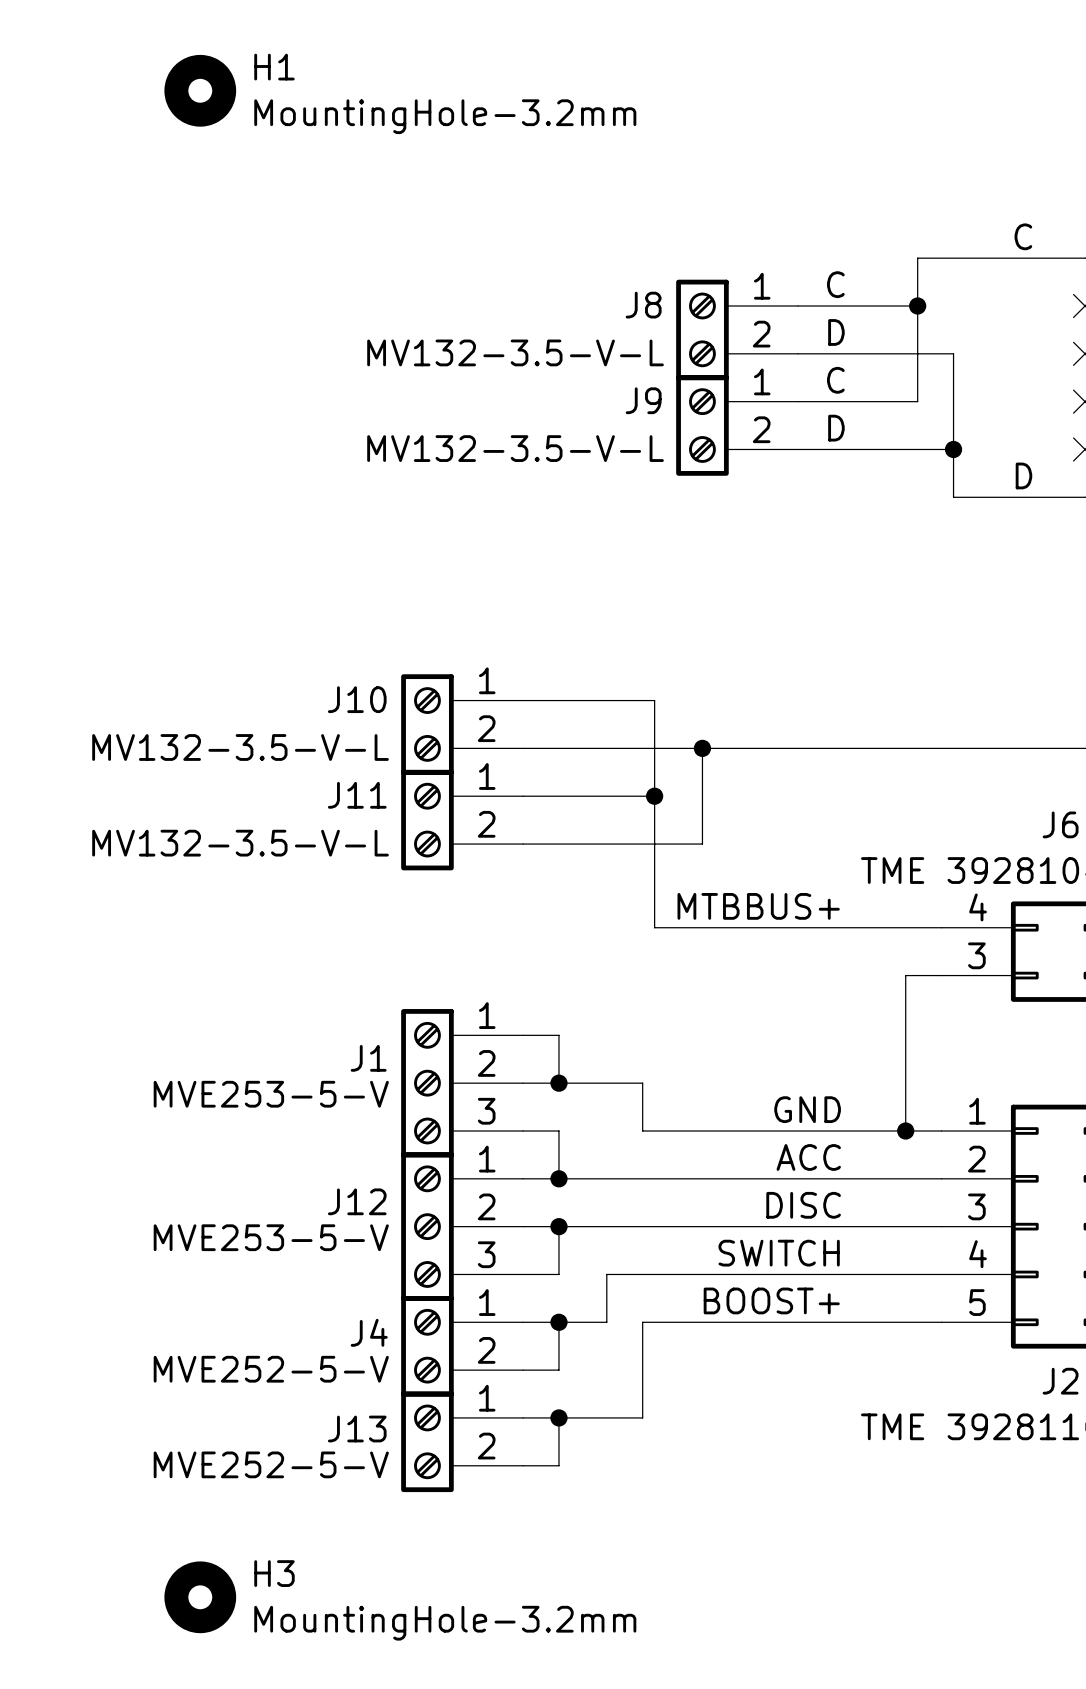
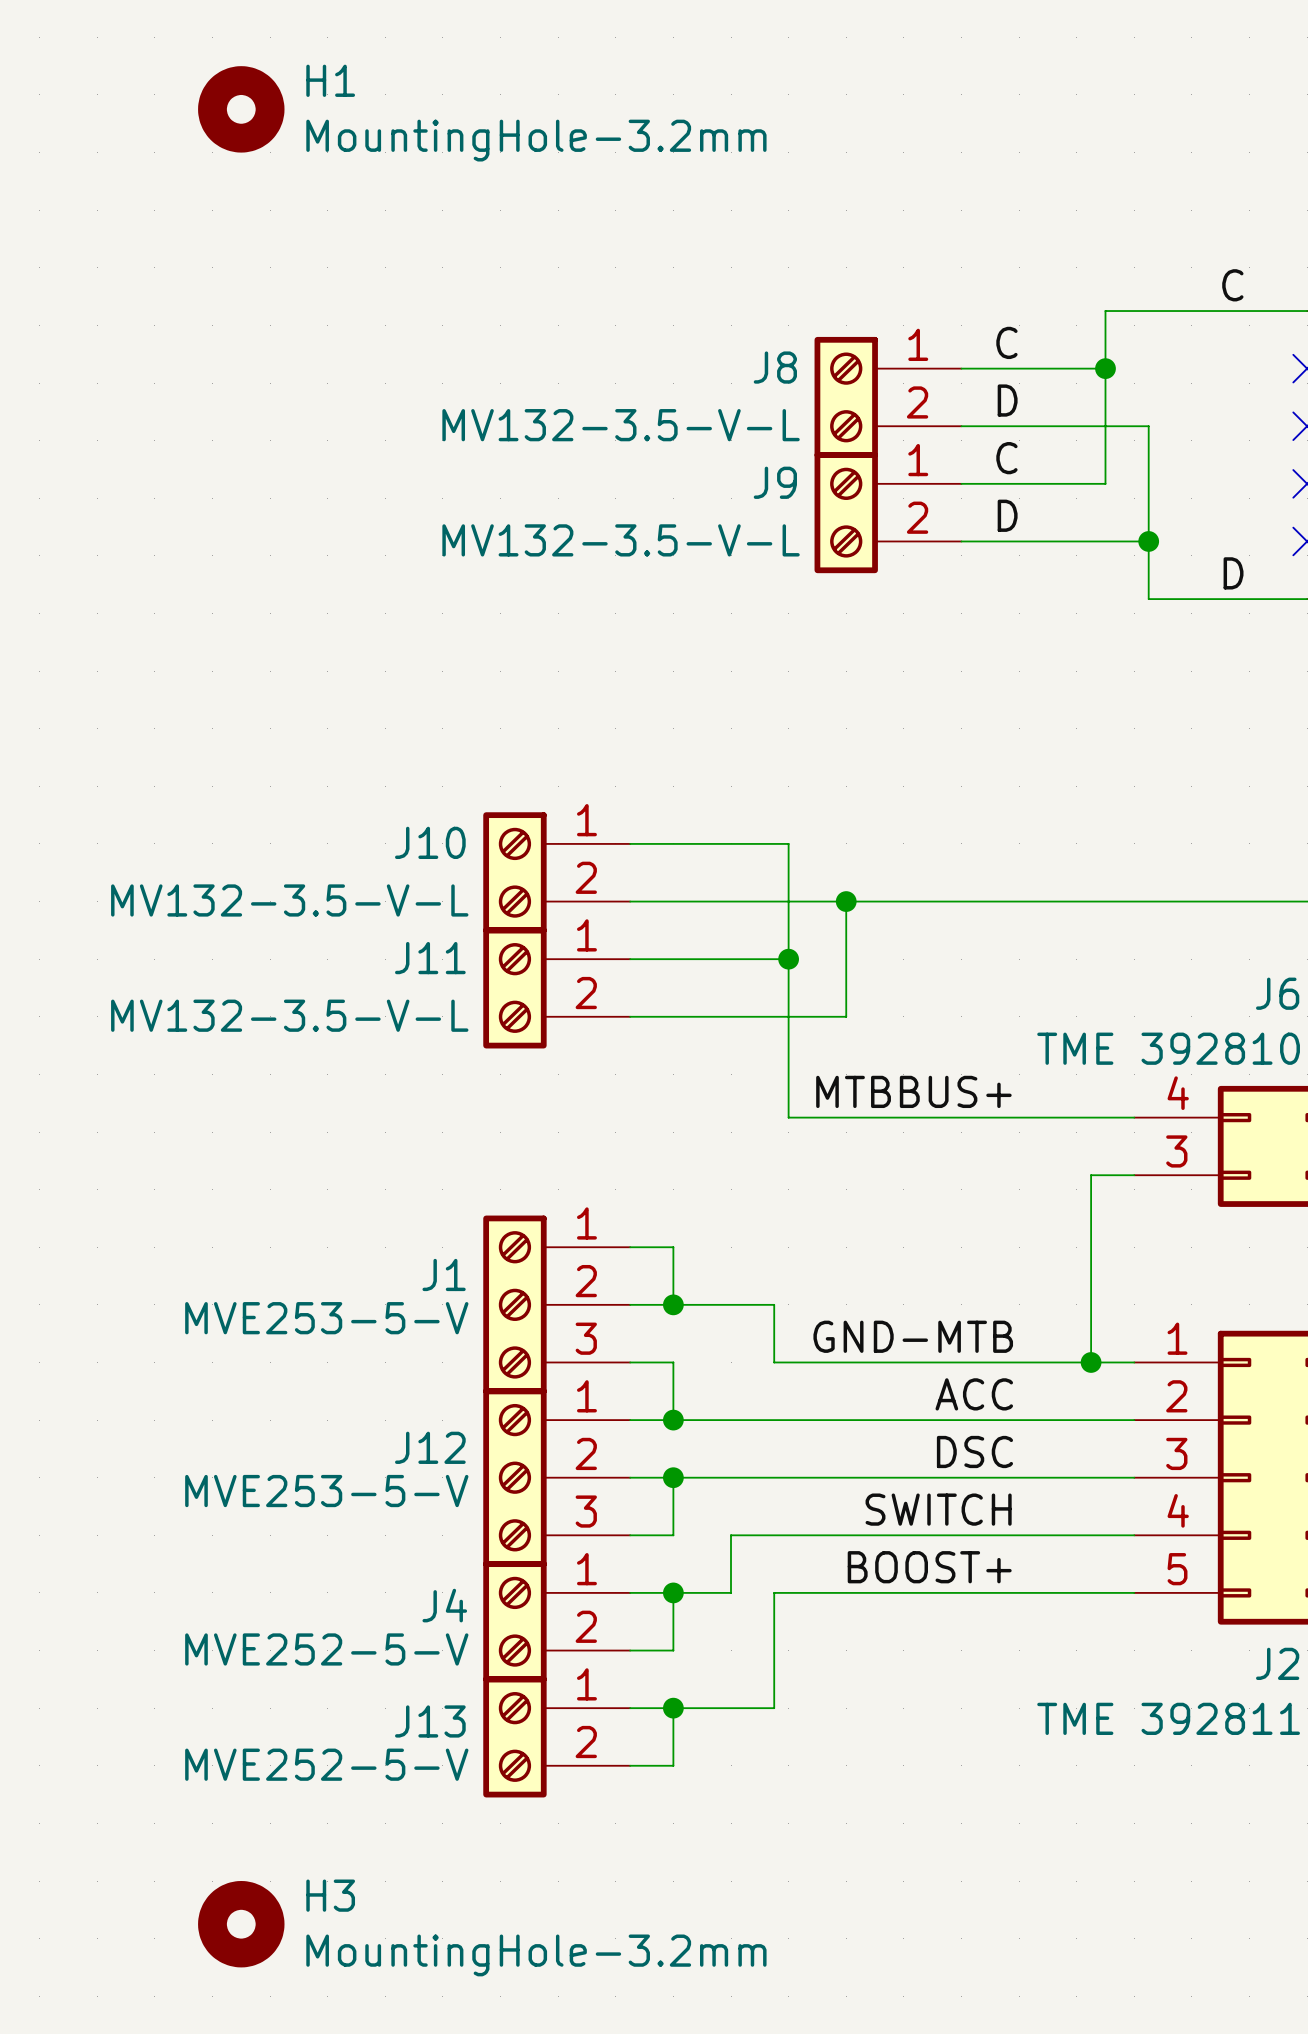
label: GND (807, 1109) -> GND-MTB (913, 1336)
label: DISC (803, 1205) -> DSC (974, 1451)

